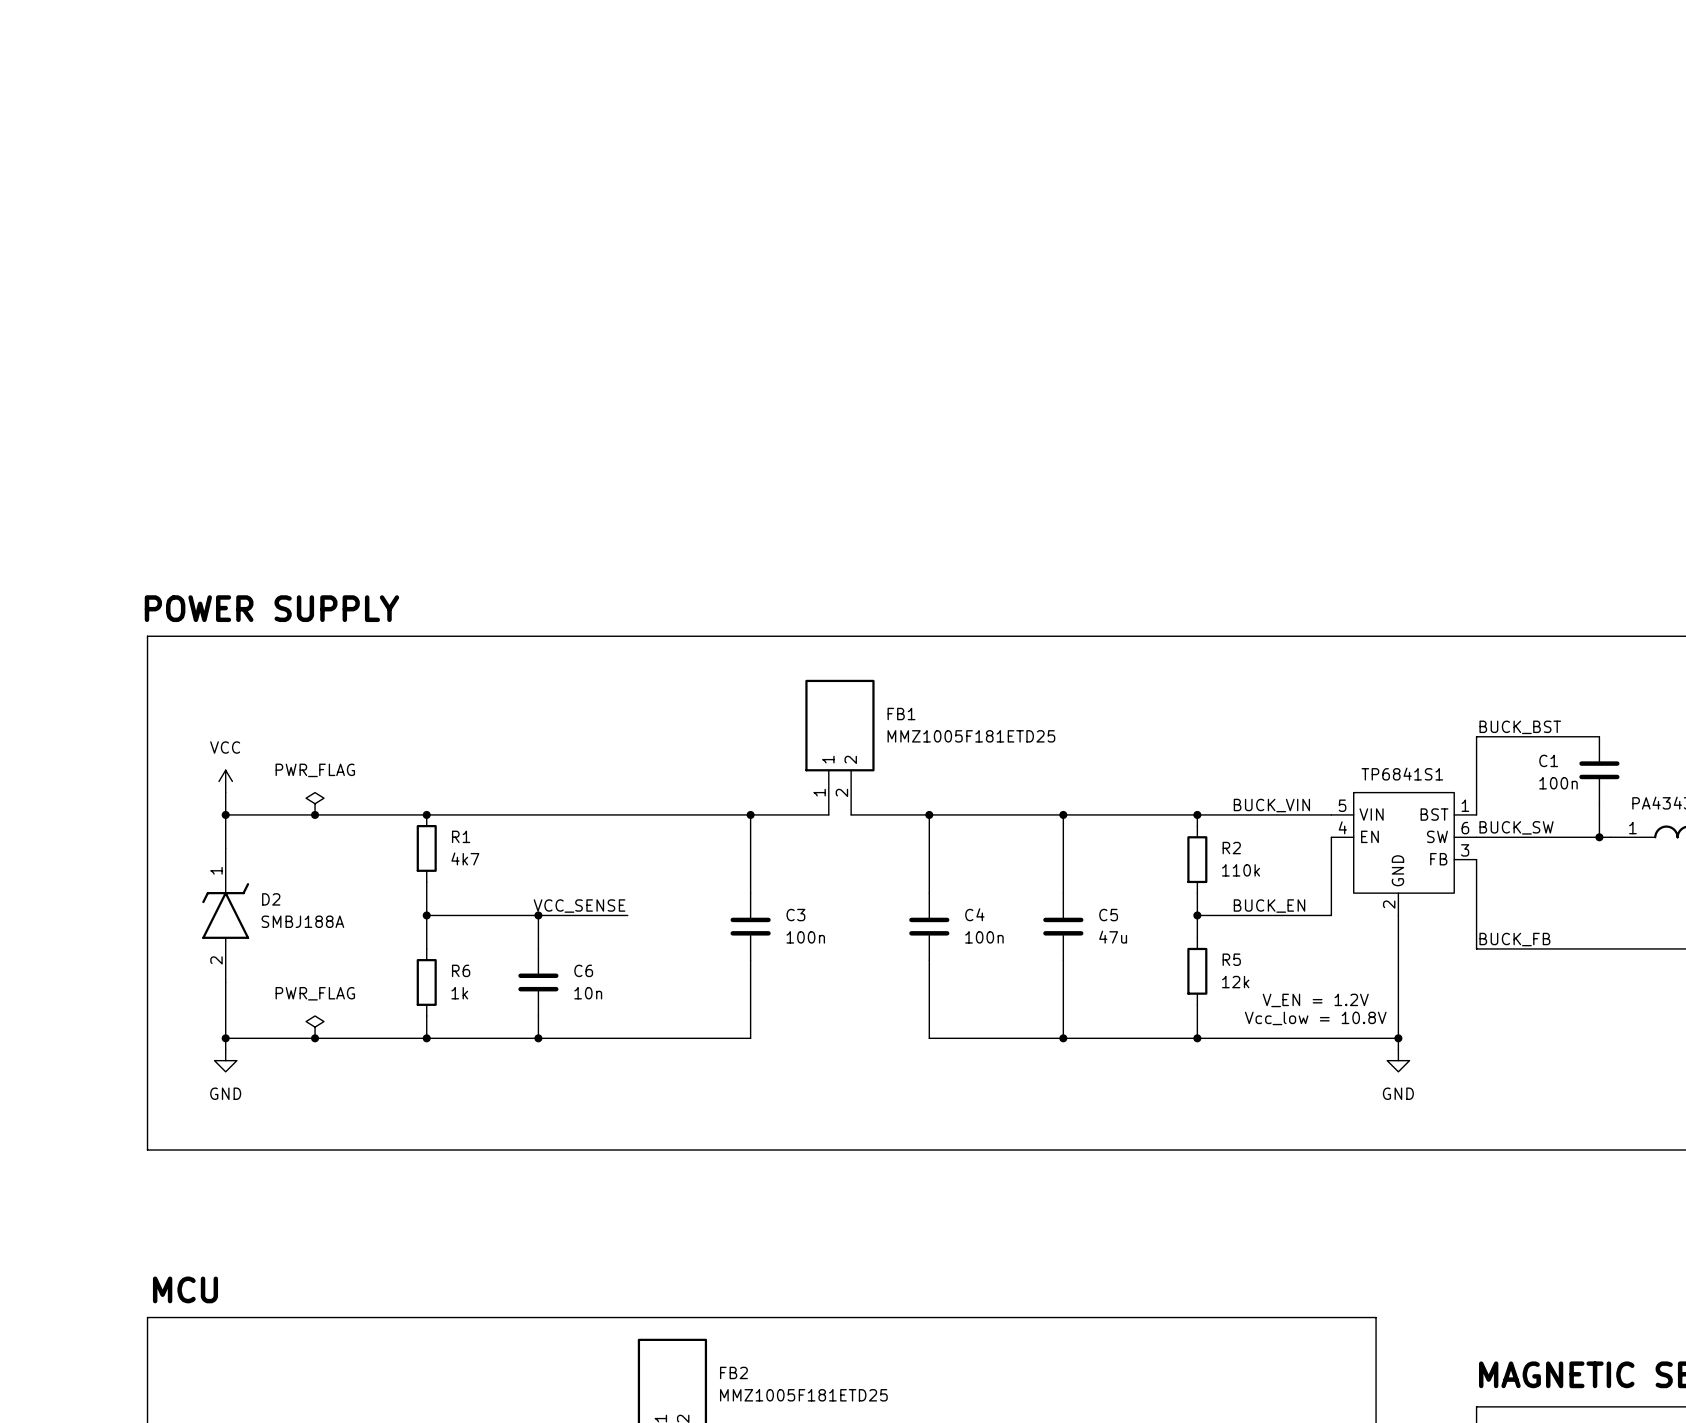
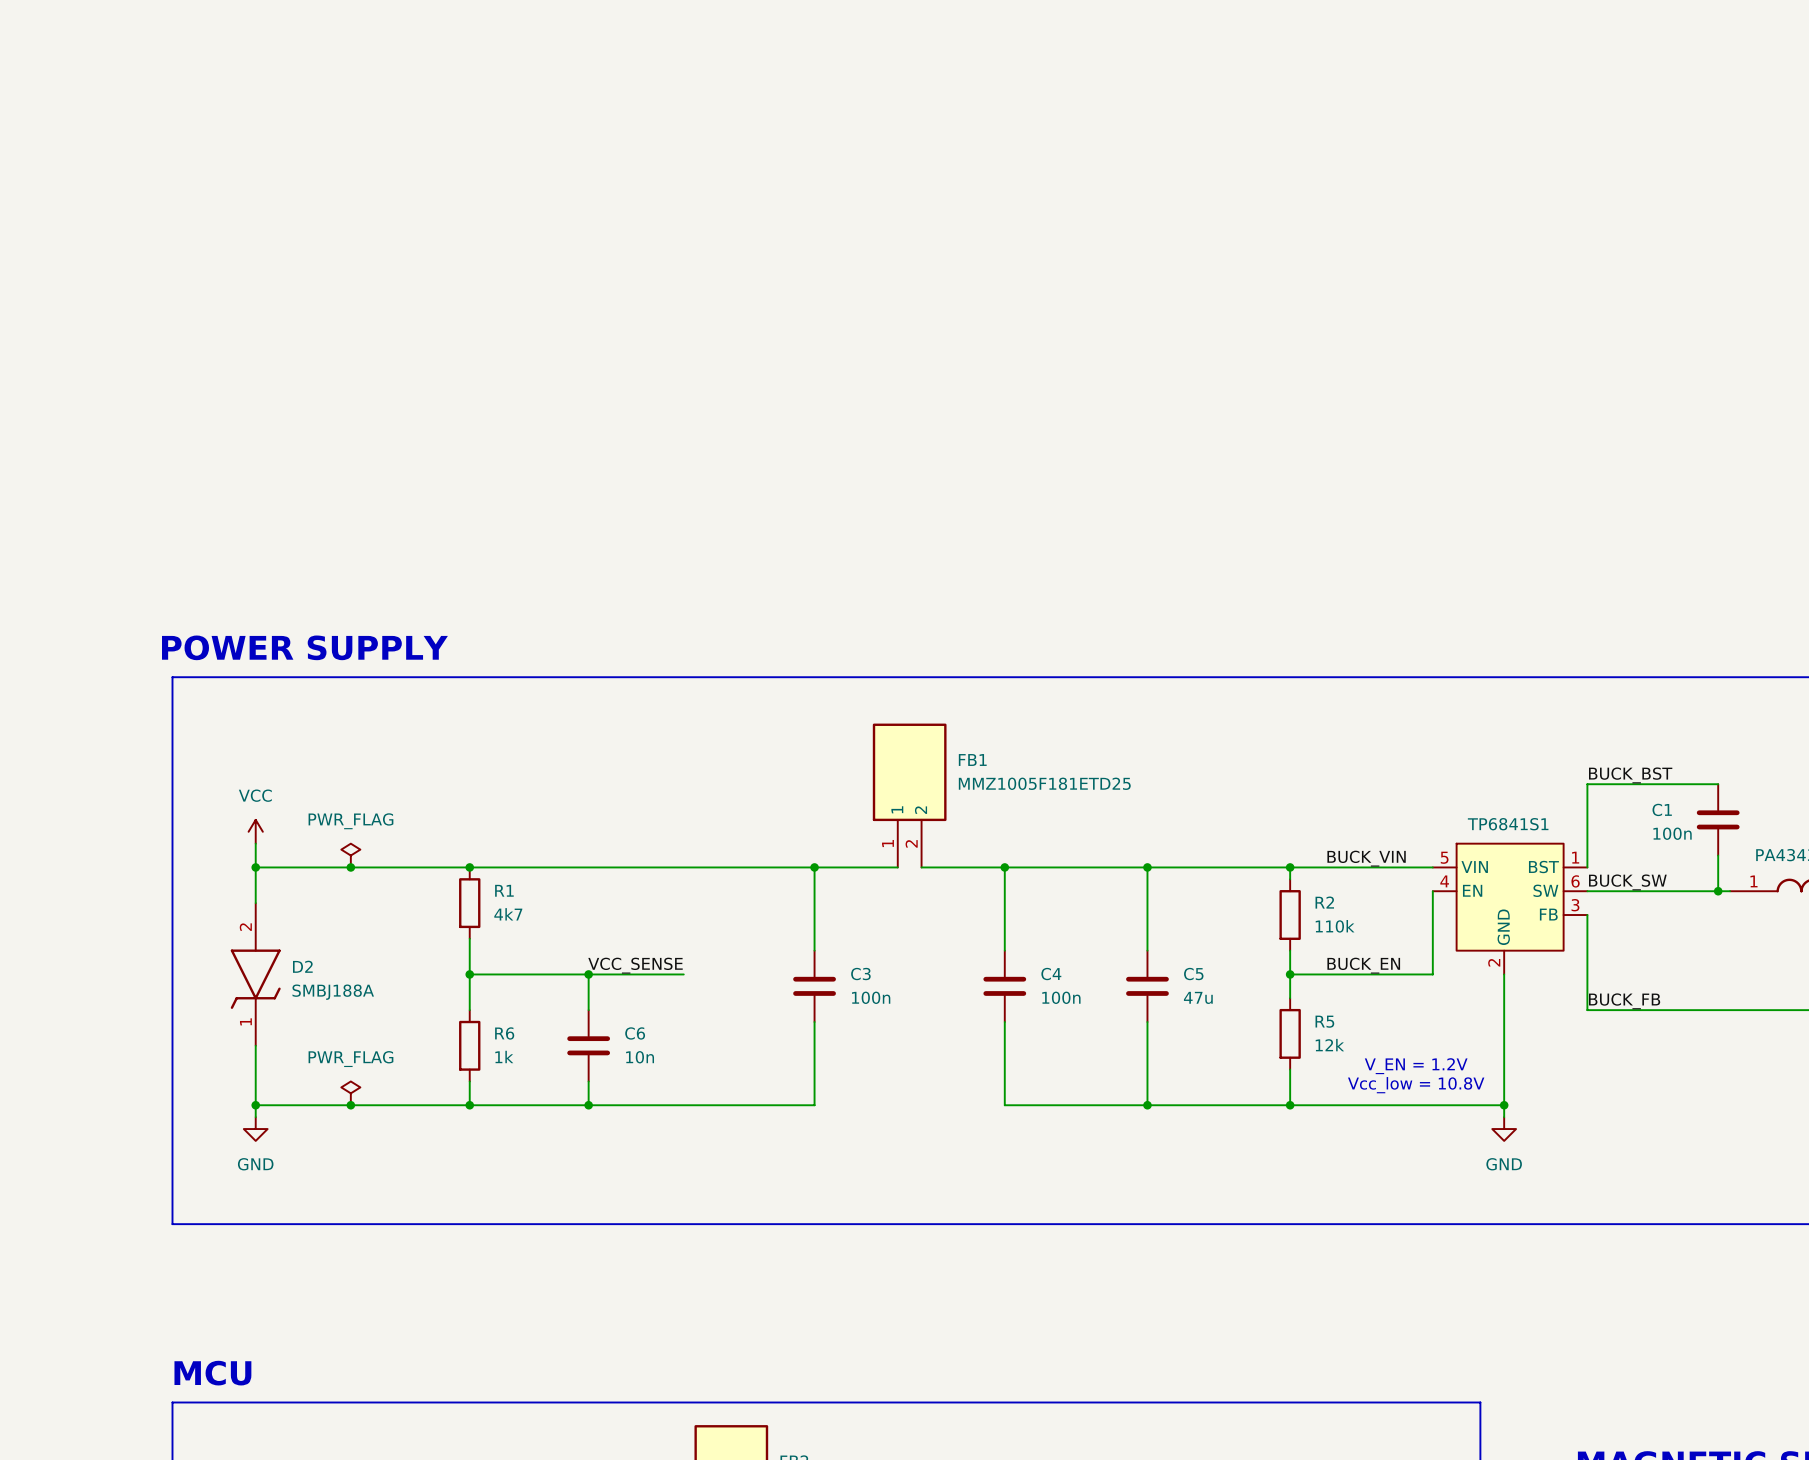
D2 rotation: 0° (225, 911) -> 180° (255, 979)

